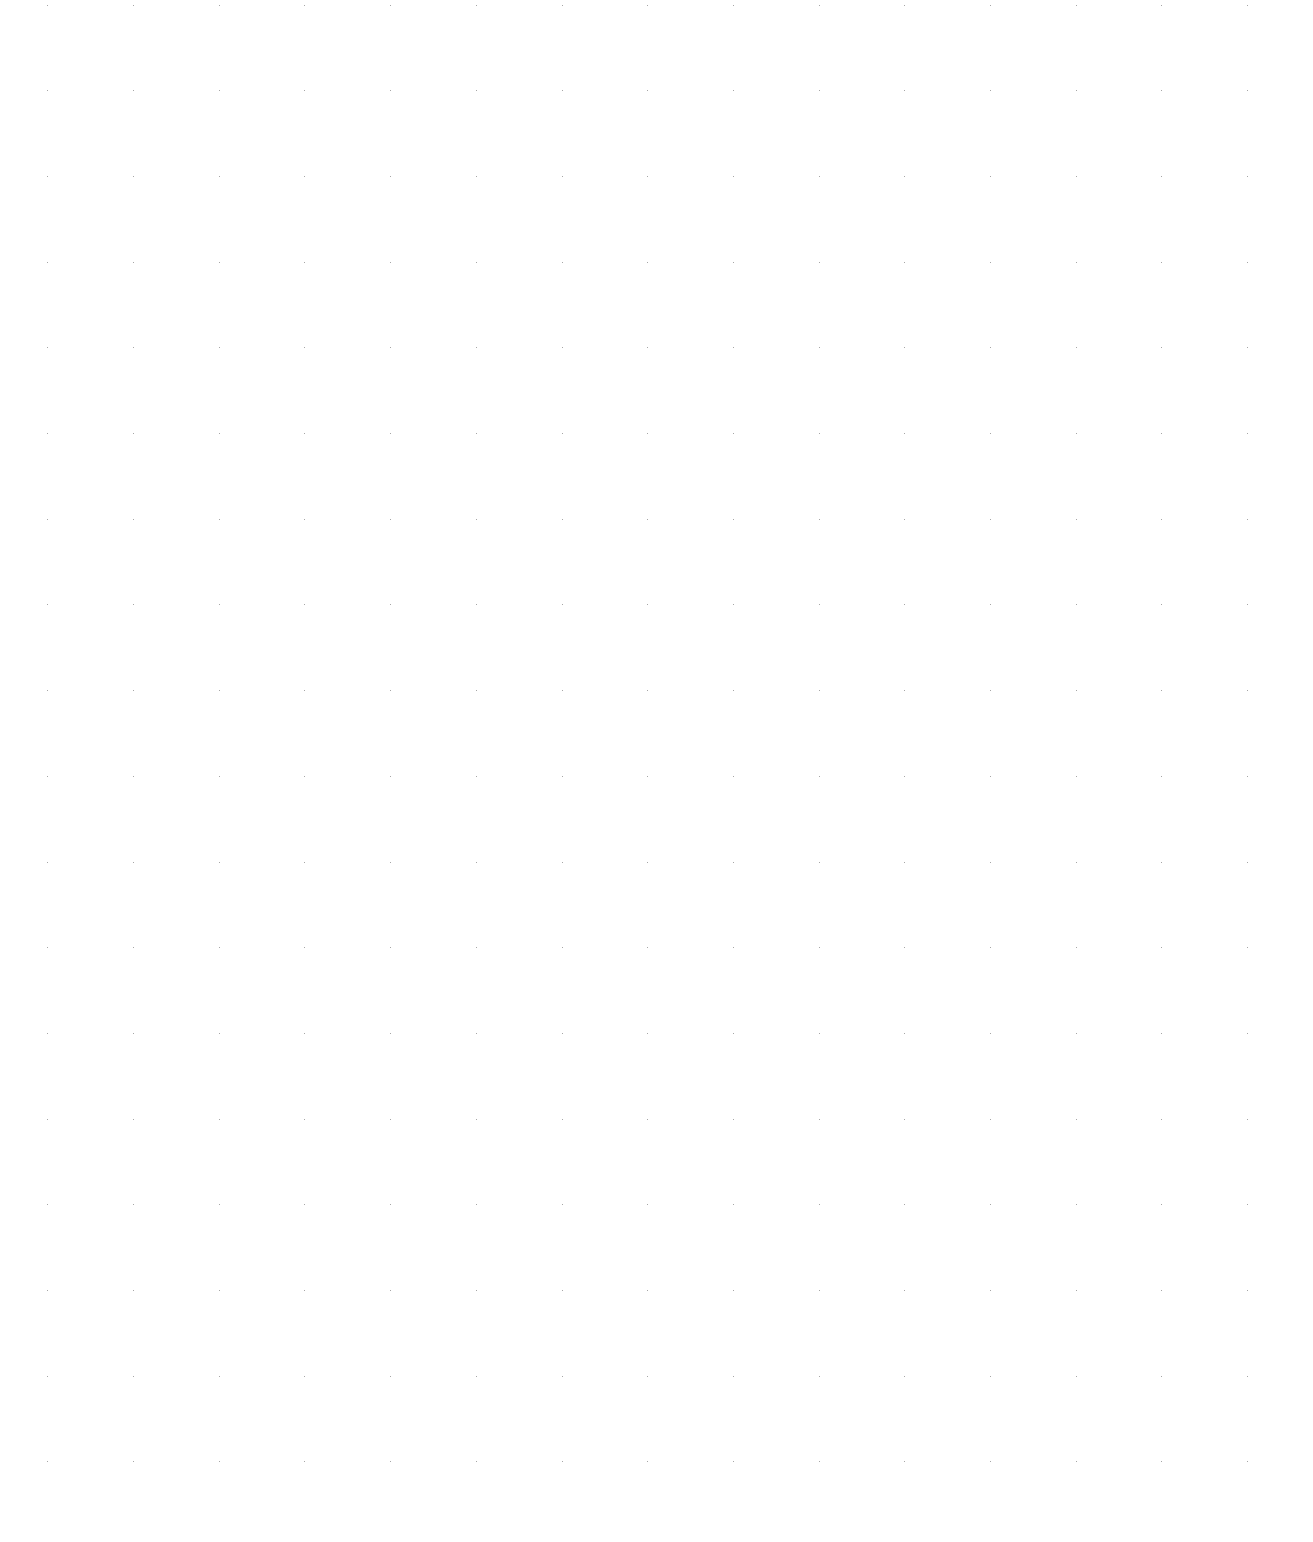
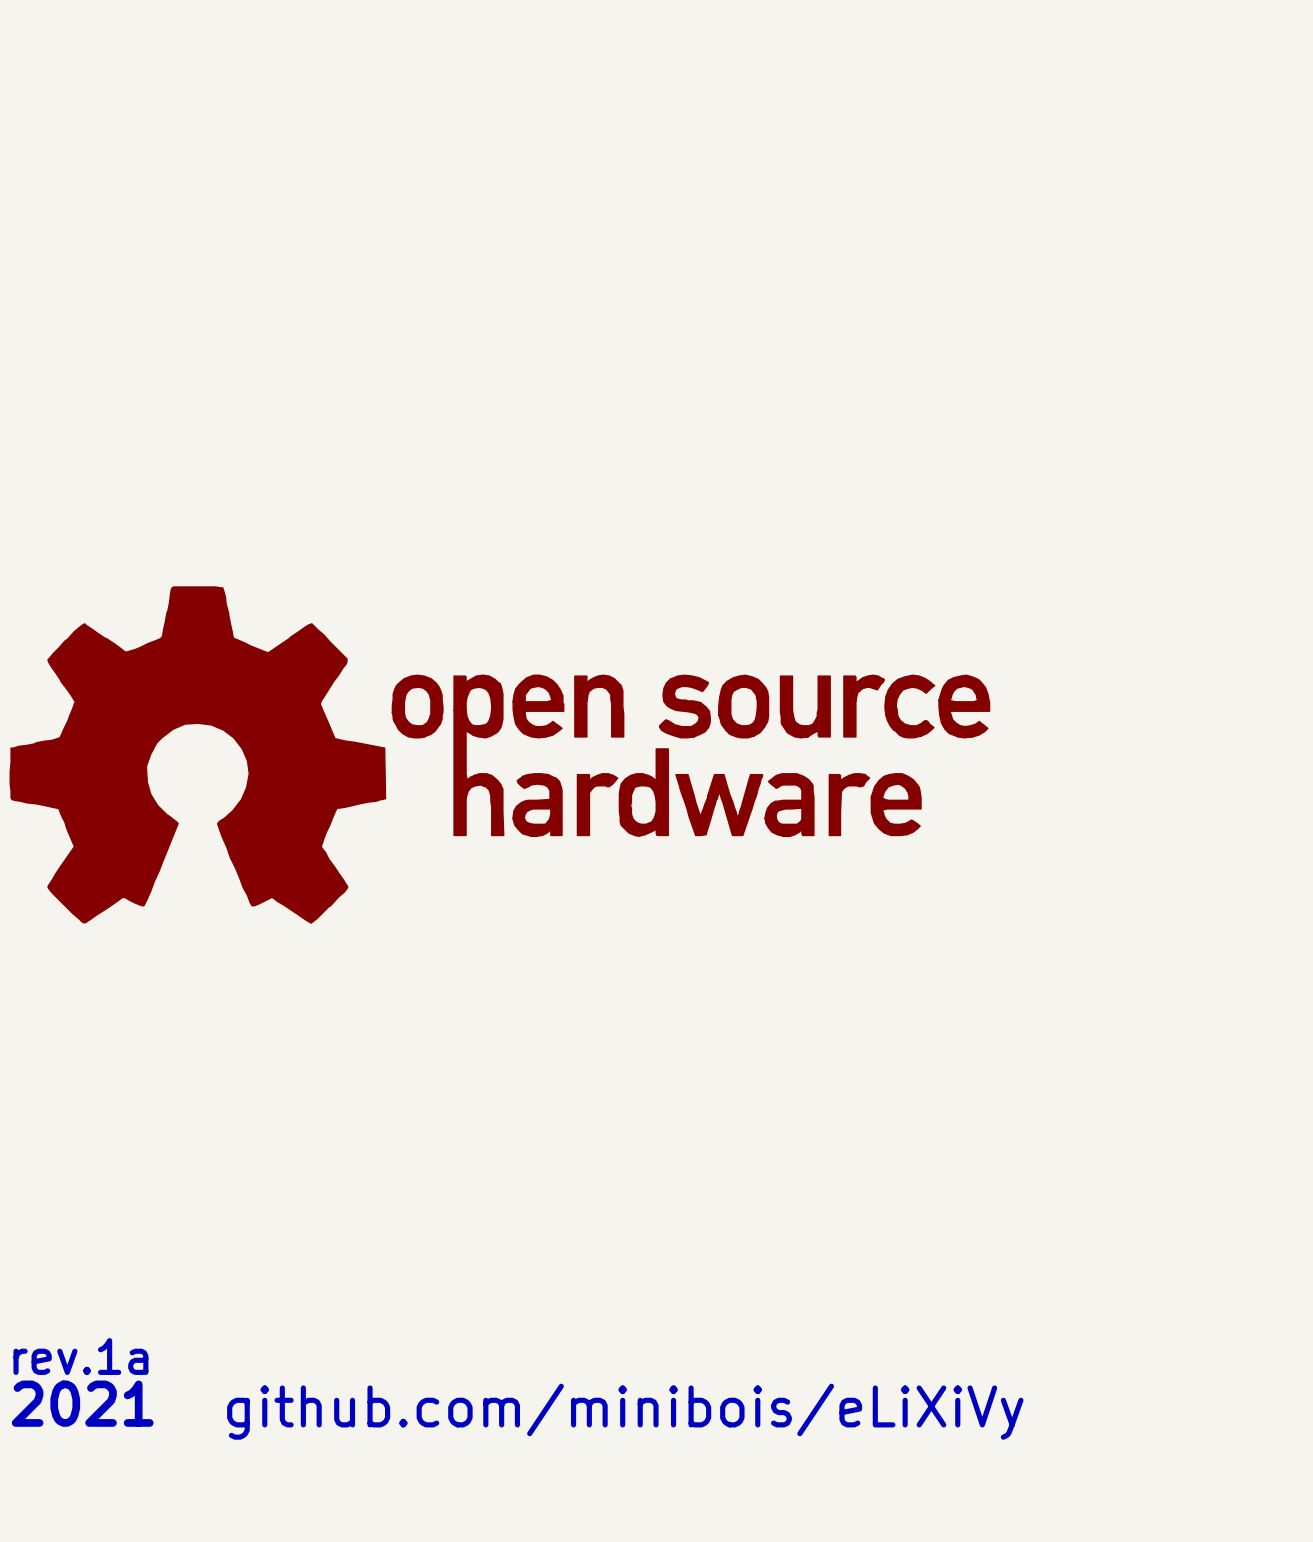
power symbol: none -> (197, 754)
power symbol: none -> (690, 755)
text: none -> rev.1a (80, 1356)
text: none -> 2021 (82, 1403)
text: none -> github.com/minibois/eLiXiVy (625, 1411)

